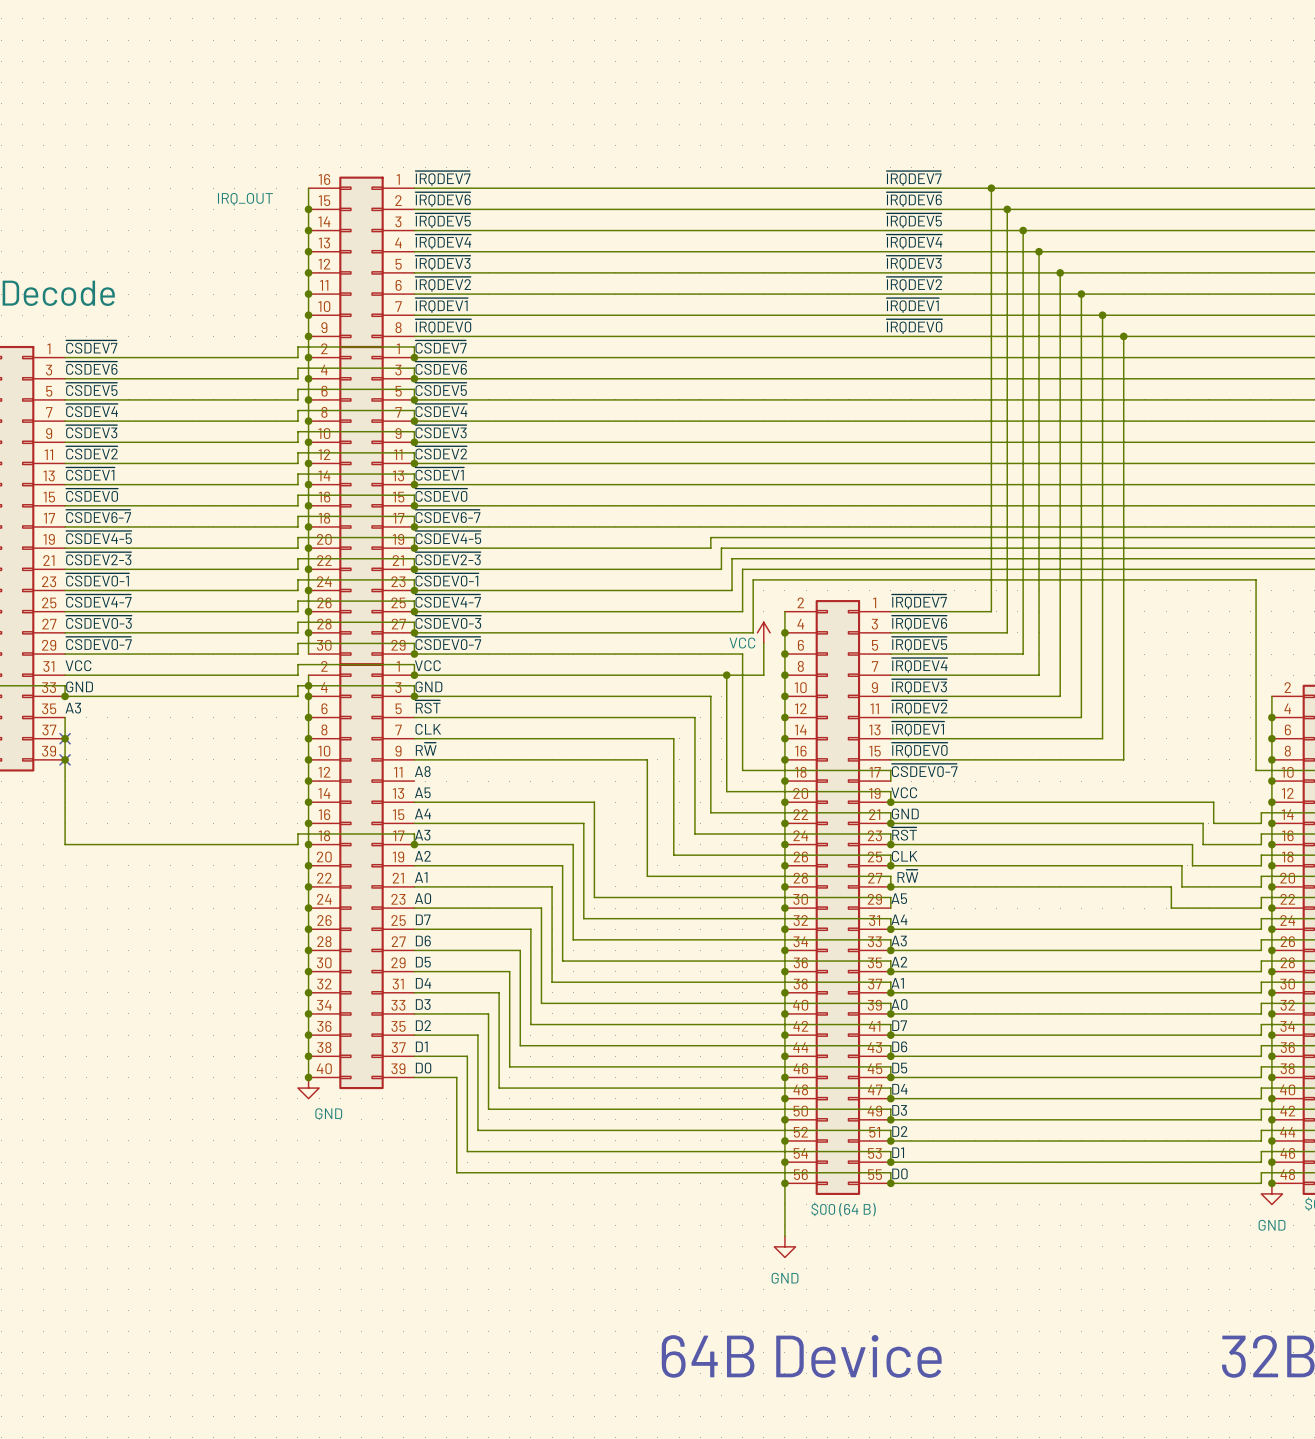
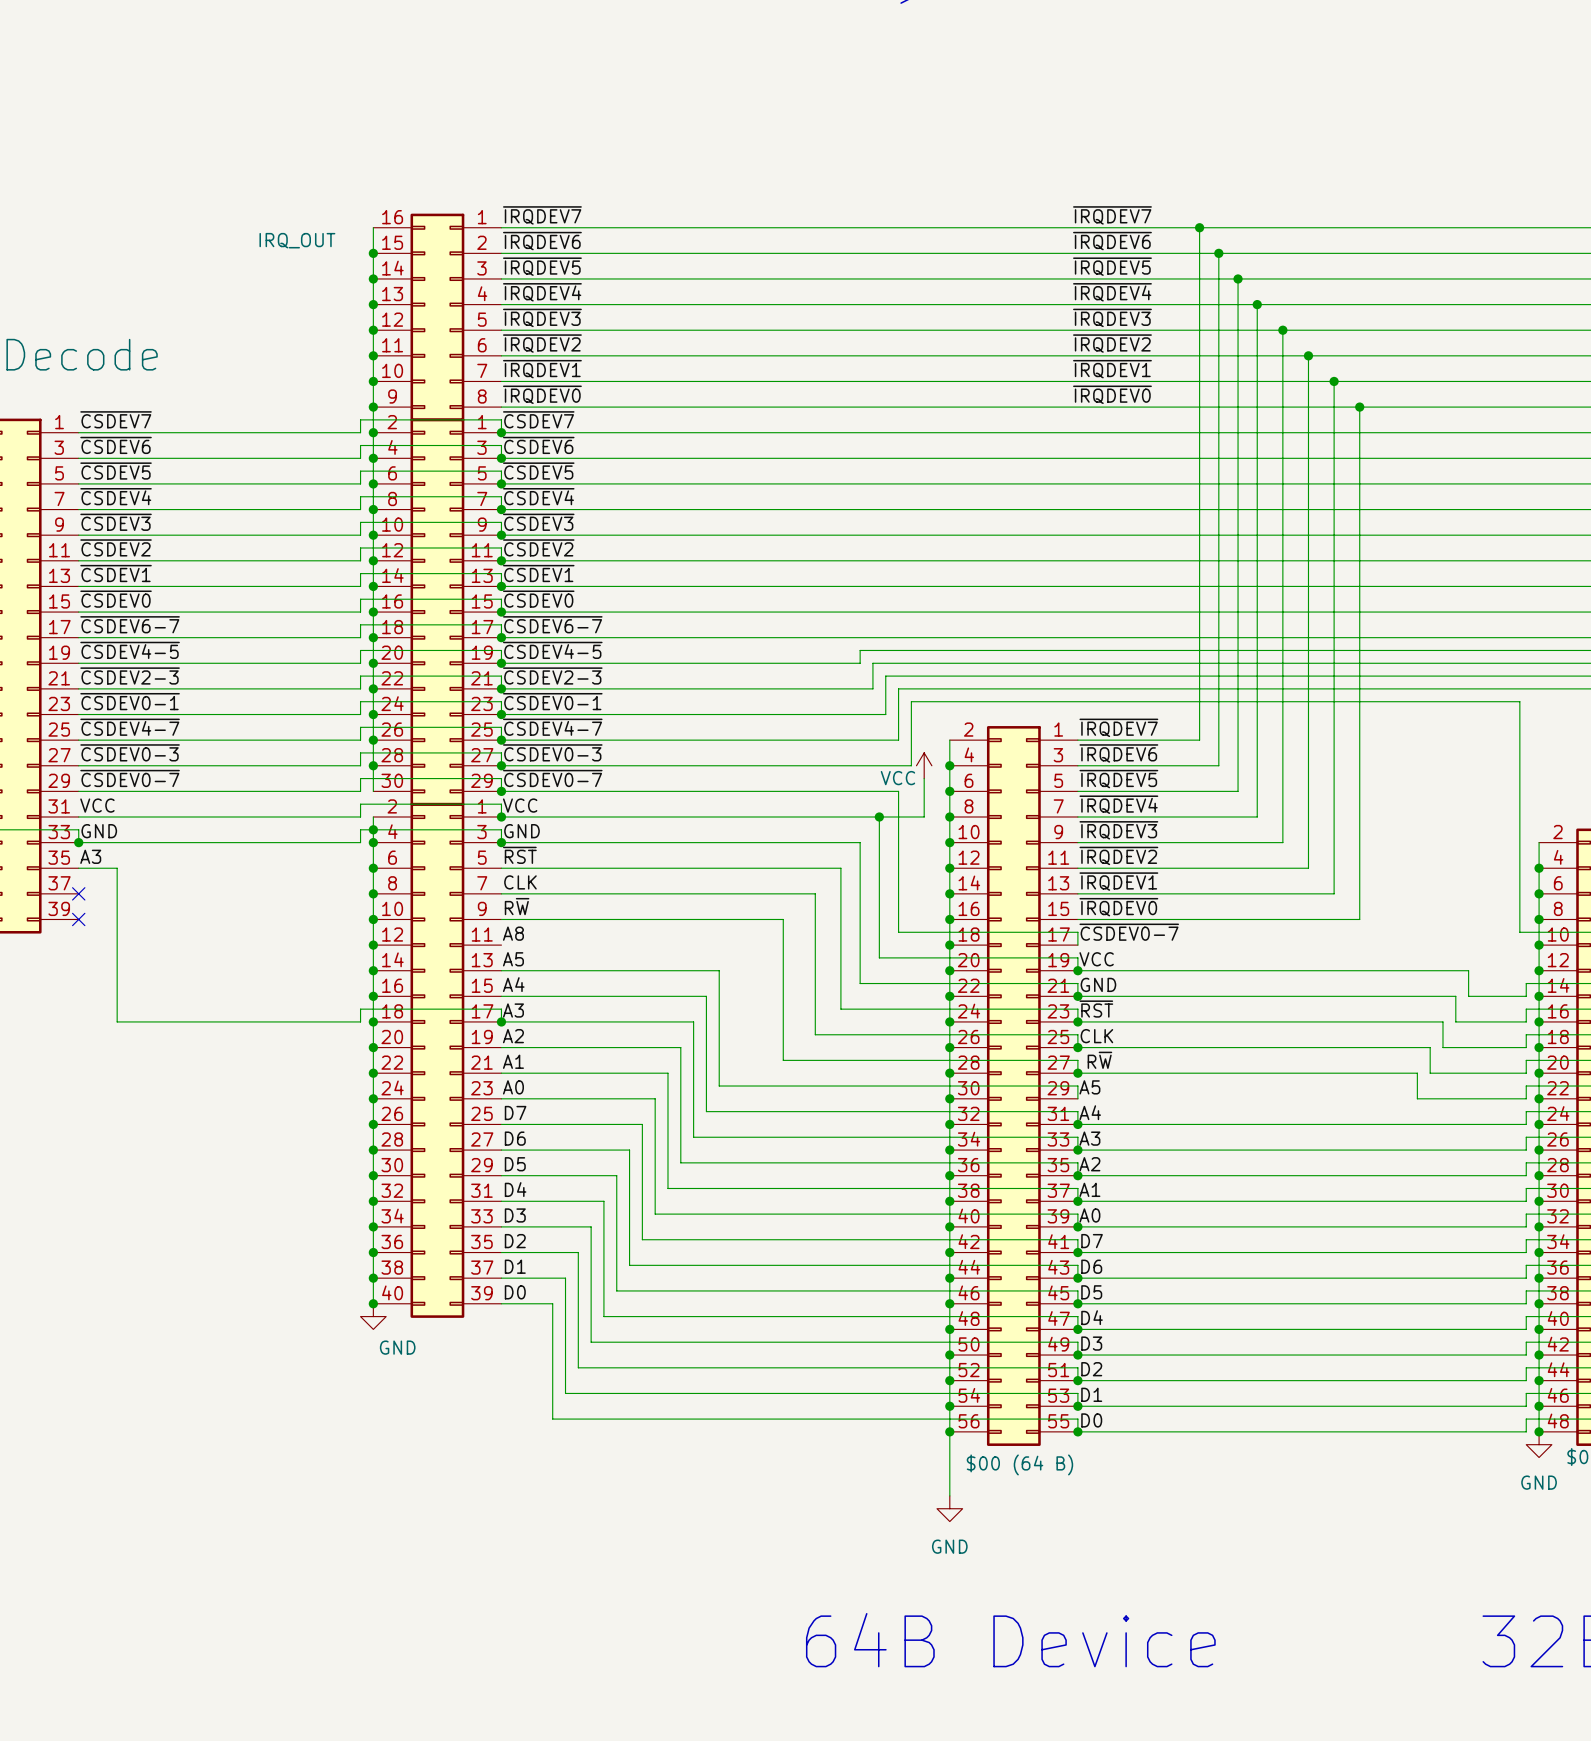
wire: (65, 717) (65, 844) (96, 844) -> (78, 868) (117, 868) (117, 1021)
junction: (65, 738) -> none
junction: (65, 759) -> none

